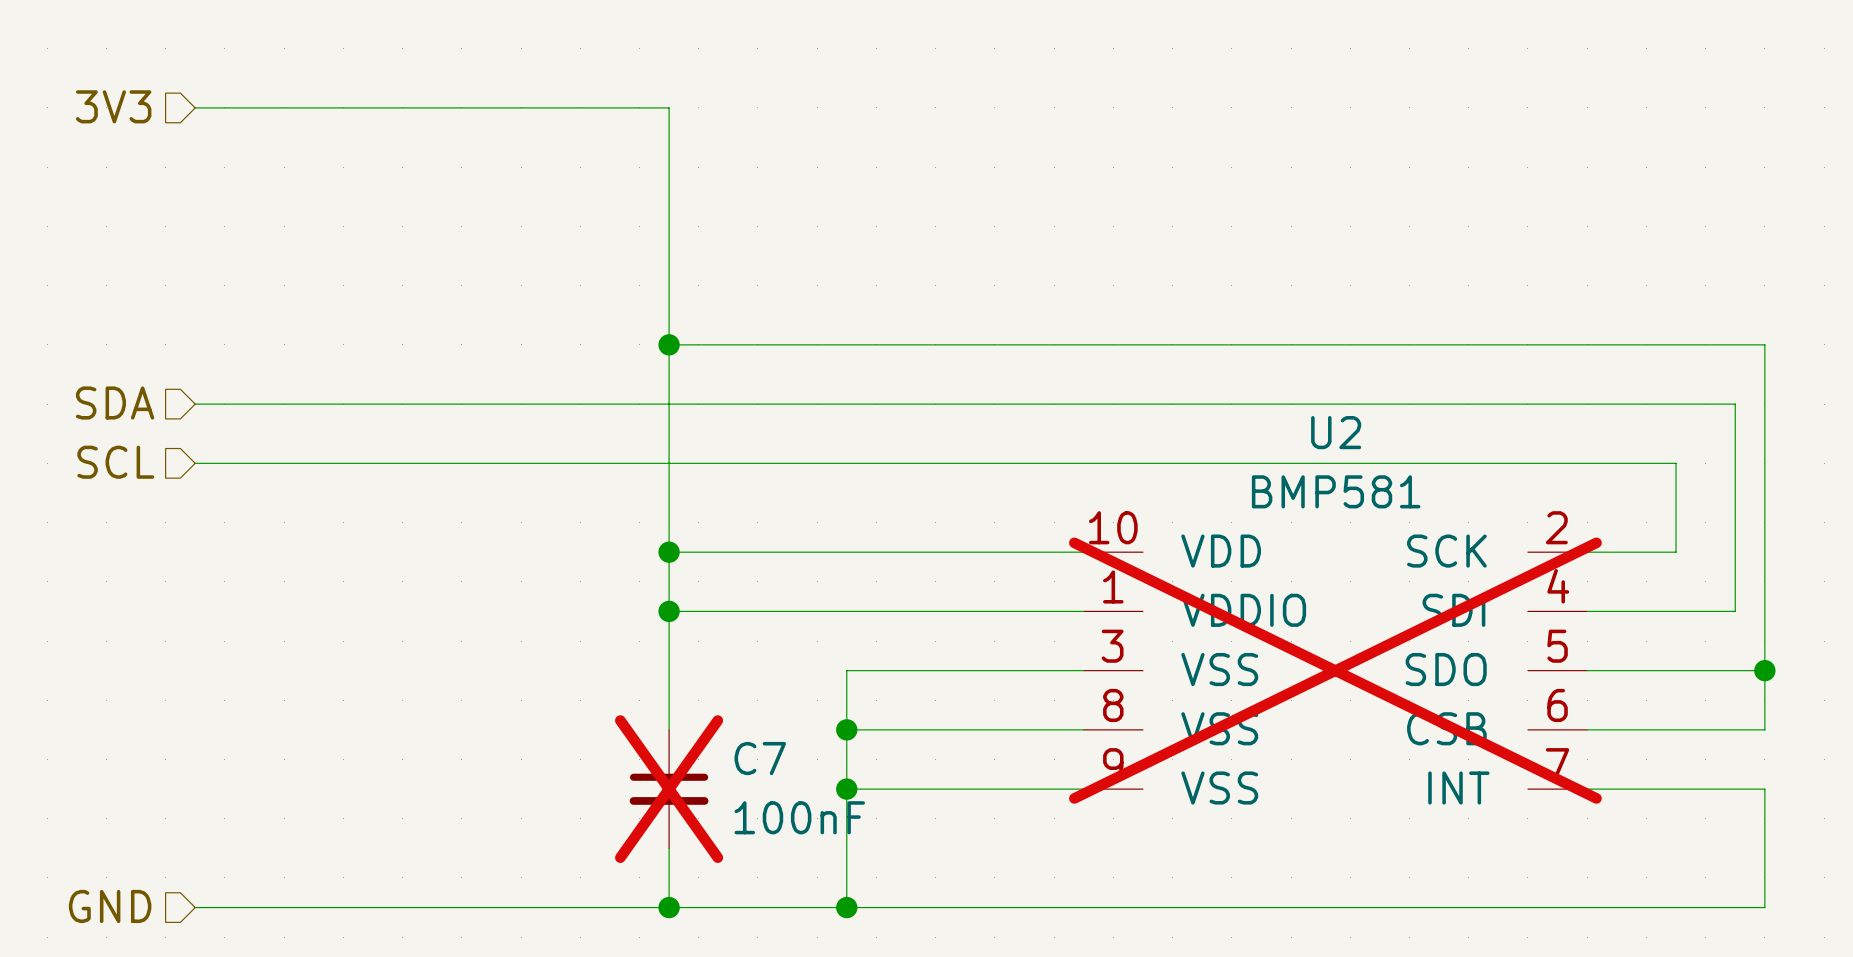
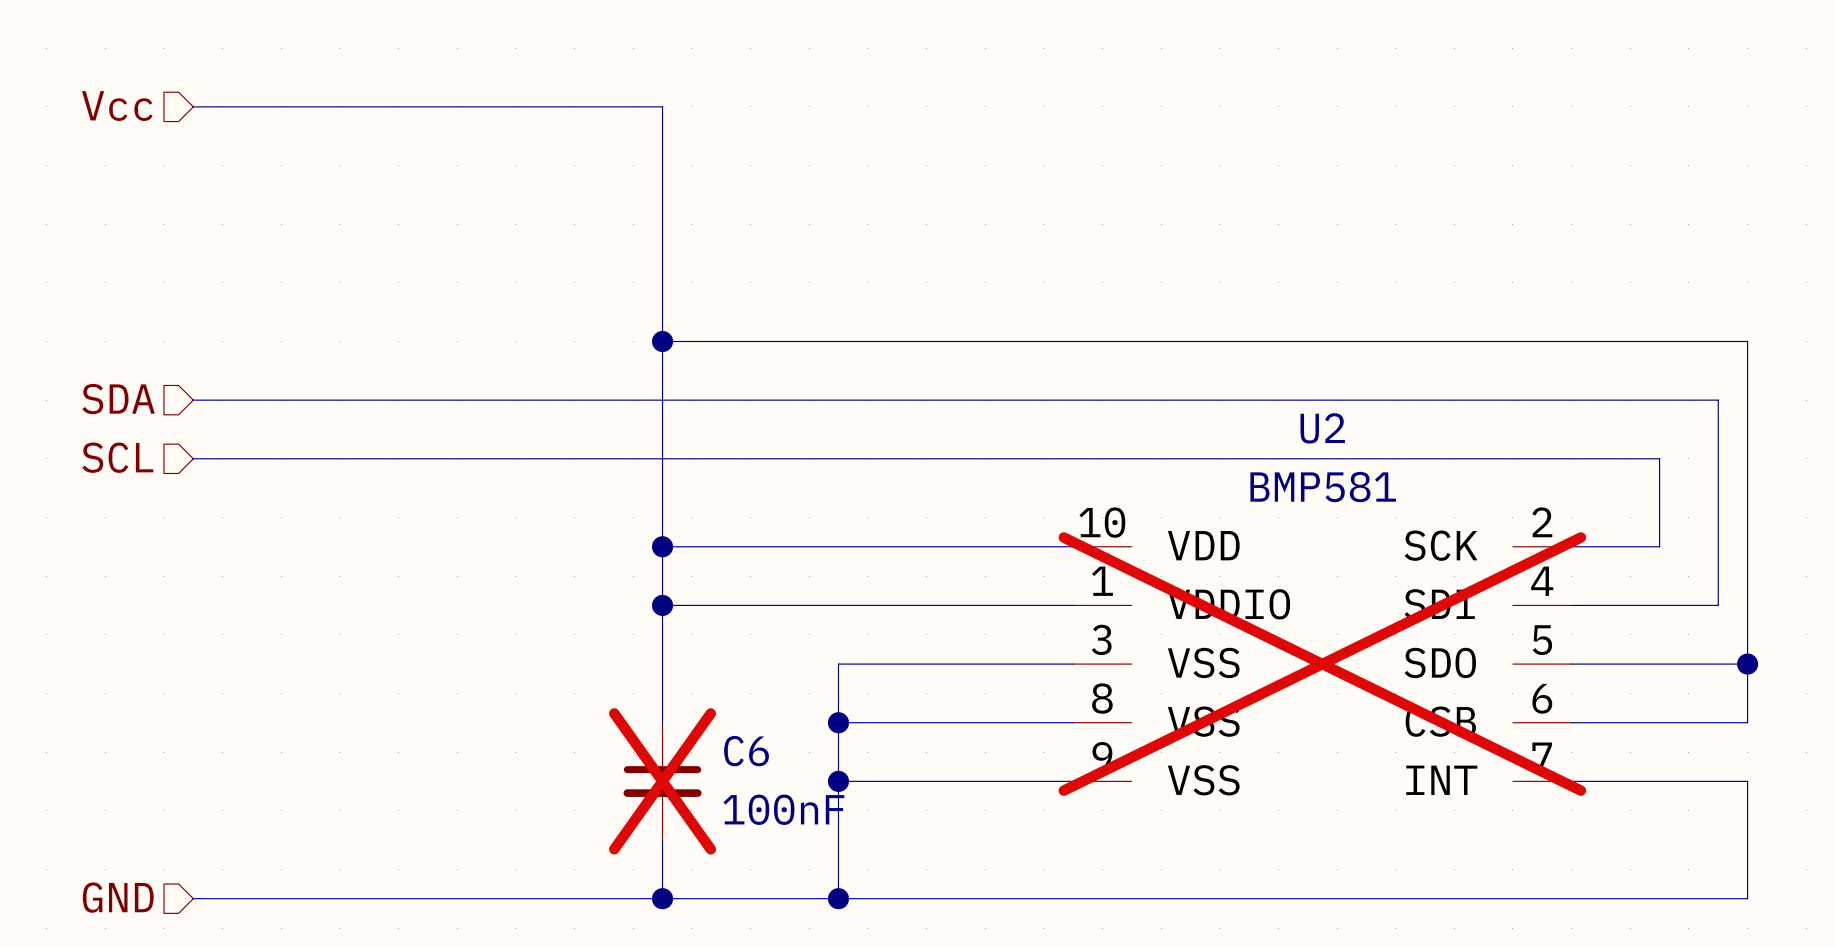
hierarchical label: 3V3 (113, 106) -> Vcc (117, 106)
C7 name: C7 (760, 758) -> C6 (746, 751)

